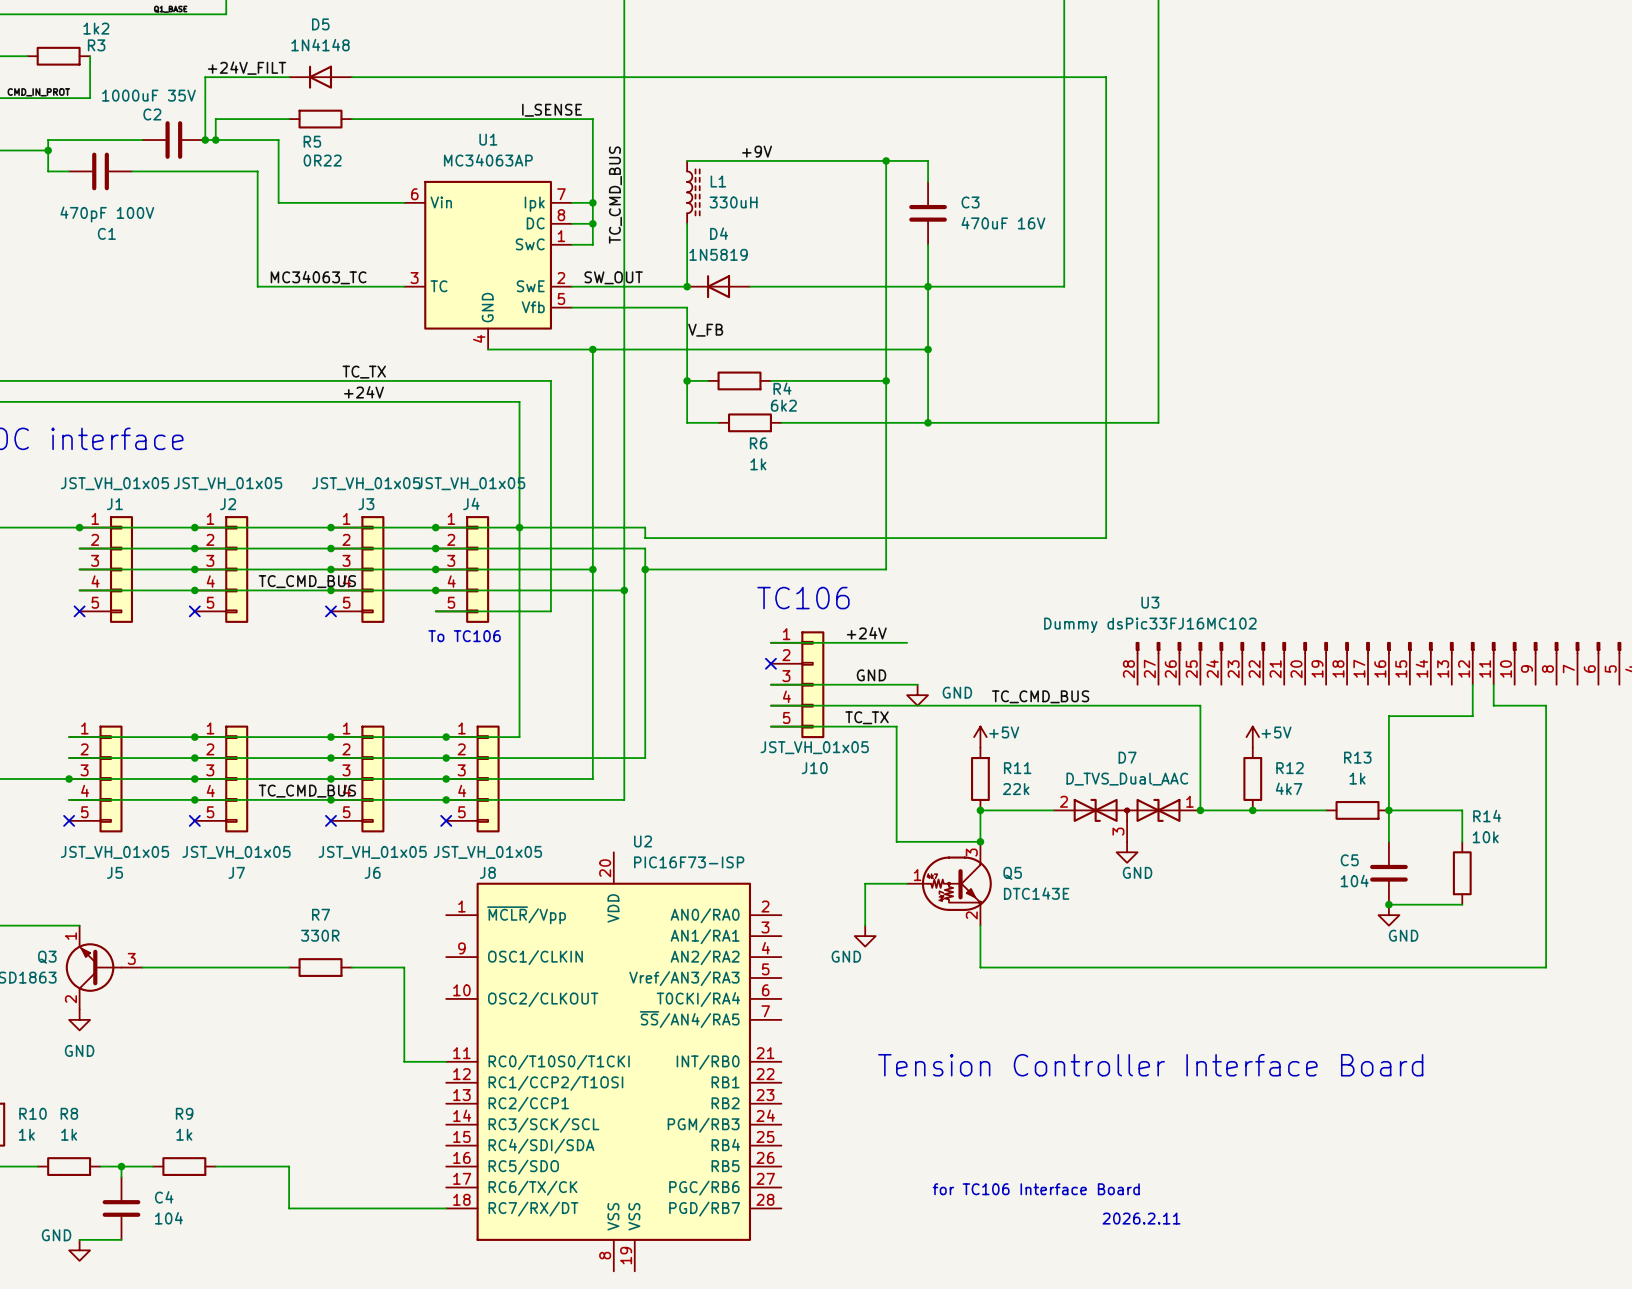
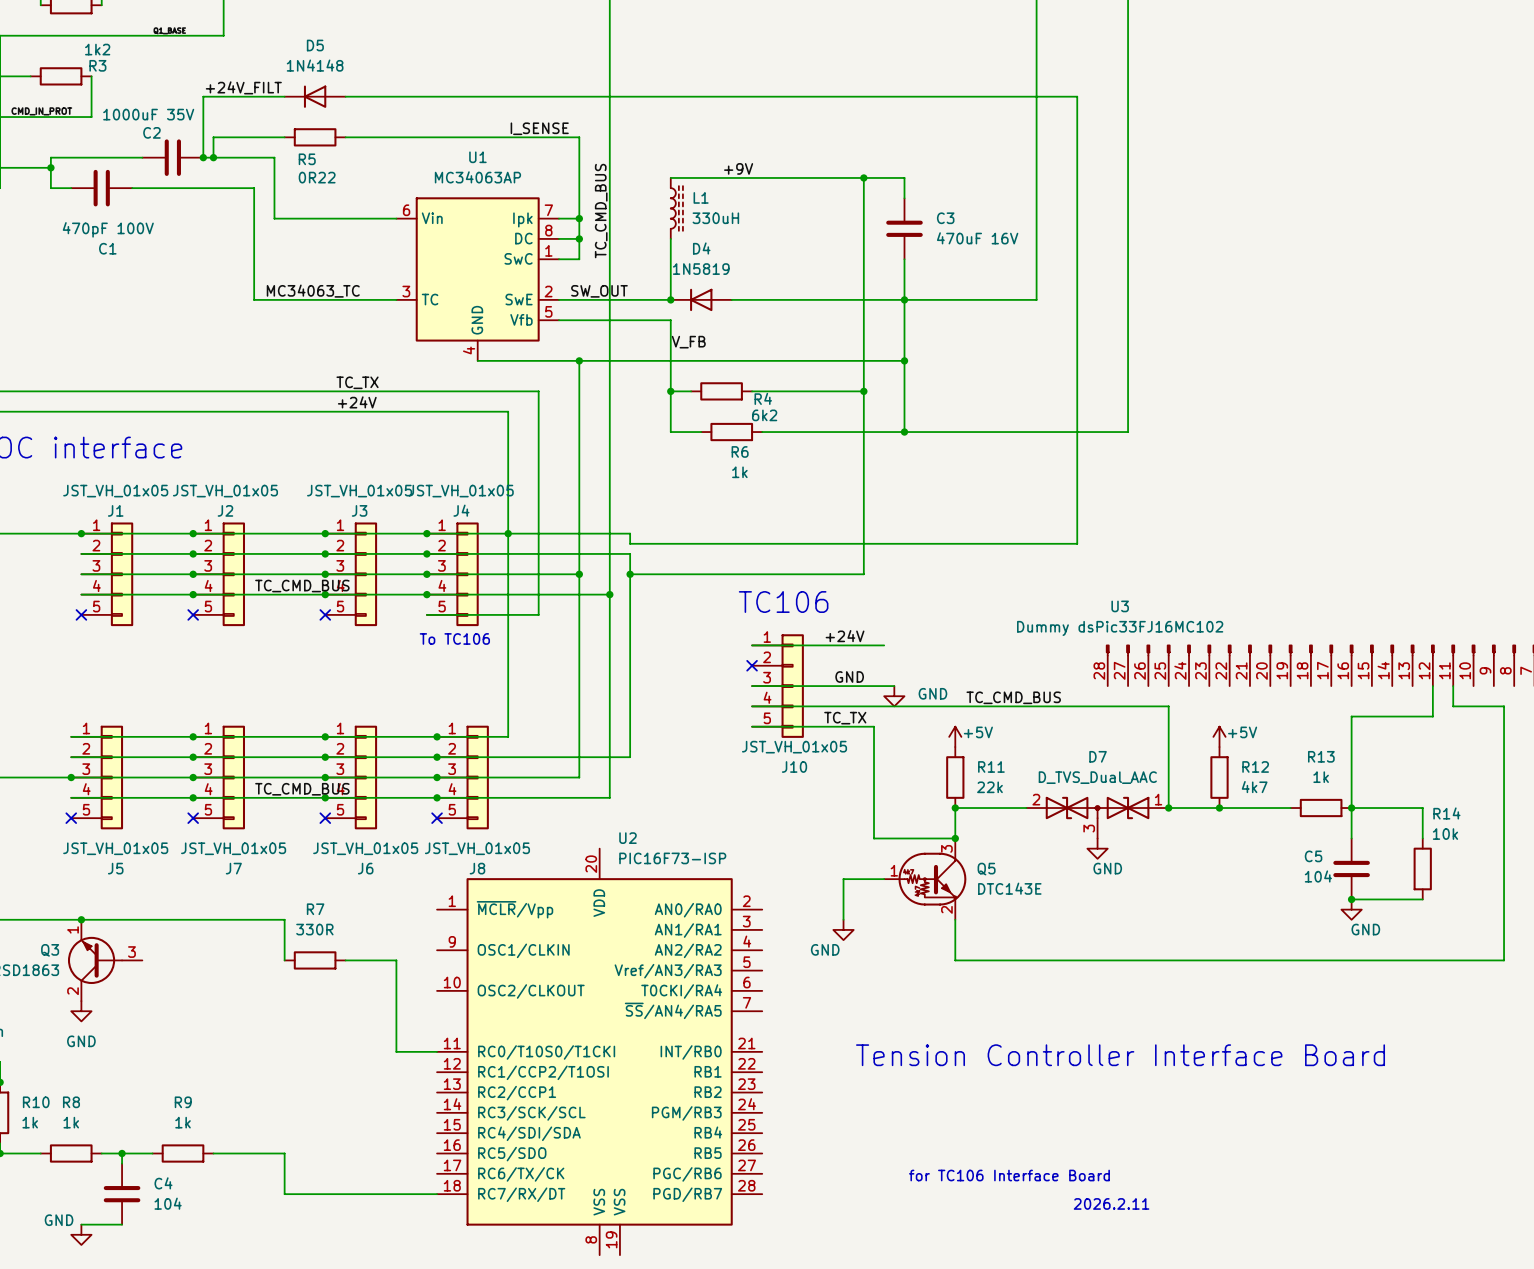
junction: none -> (81, 919)
wire: (142, 967) (289, 967) -> (81, 919) (284, 919) (284, 960)

